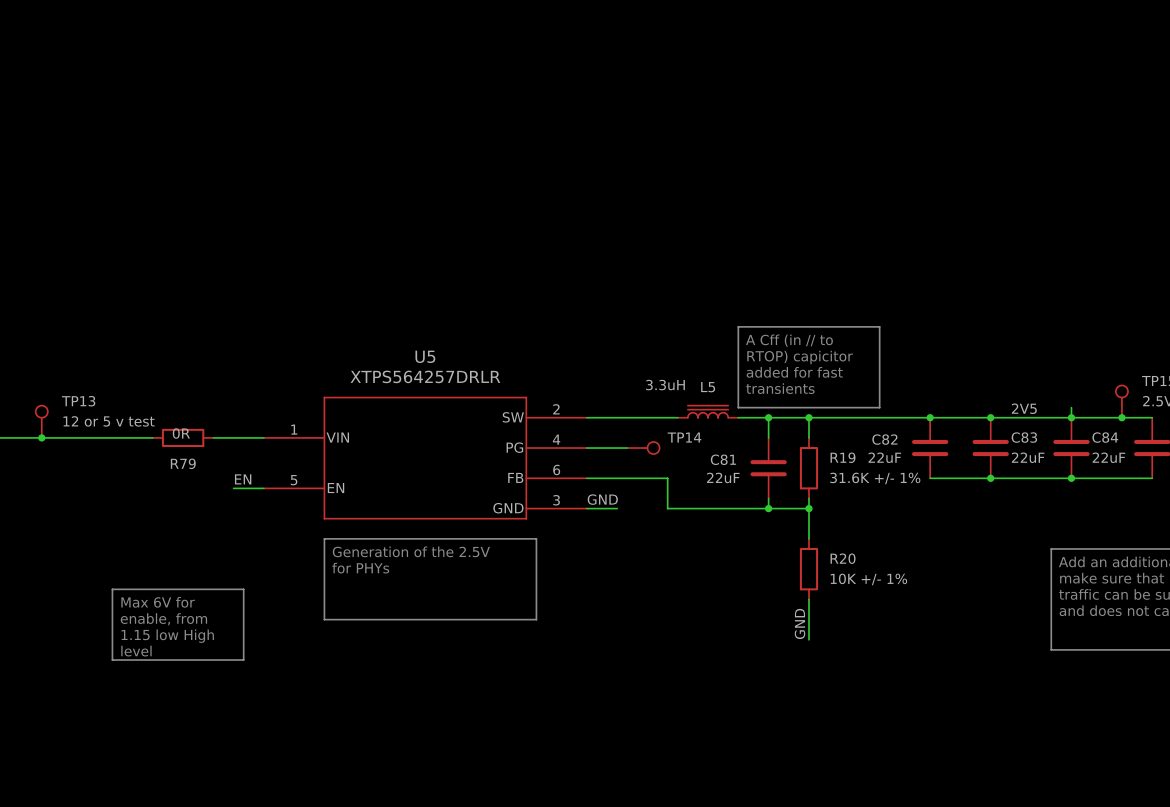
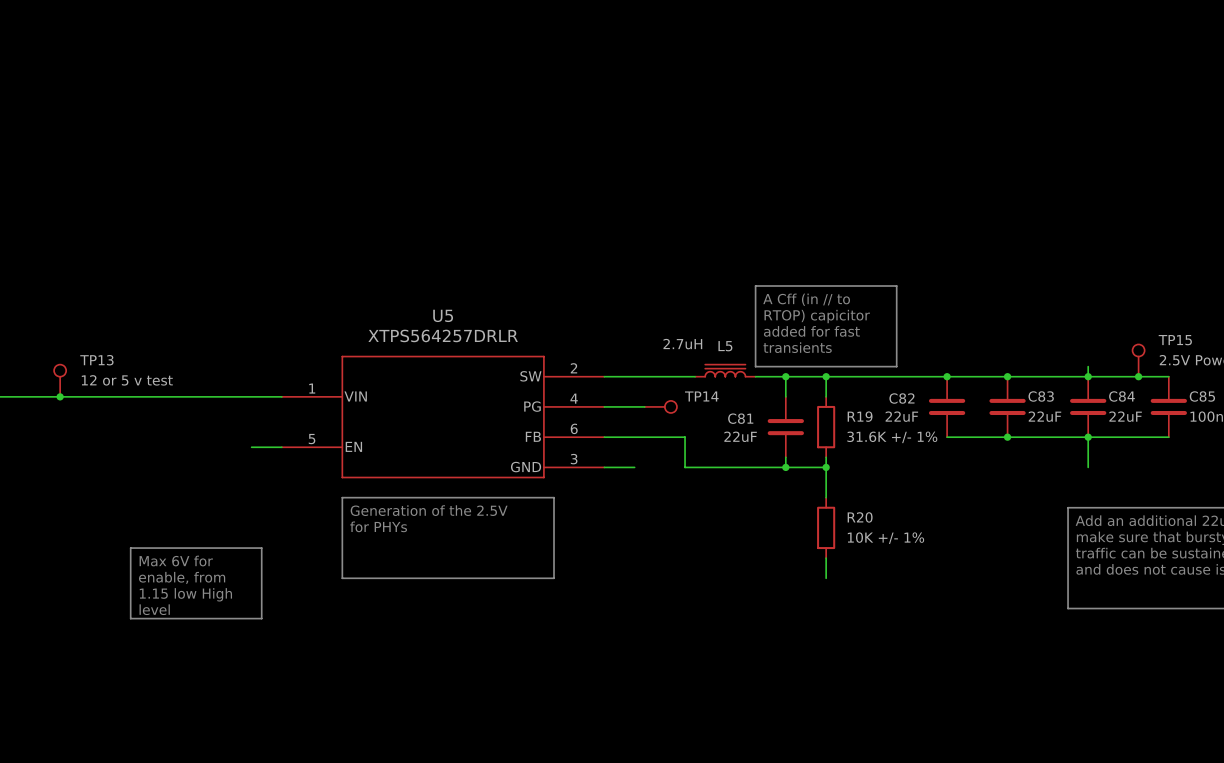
L5 value: 3.3uH (665, 385) -> 2.7uH (682, 344)
label: 2V5 (1024, 408) -> none
wire: none -> (171, 396) (231, 396)
R79: 0R (183, 437) -> none
wire: none -> (1088, 437) (1088, 467)
label: EN (243, 479) -> none
label: GND (602, 499) -> none
wire: (808, 619) (808, 639) -> none
label: GND (799, 623) -> none

